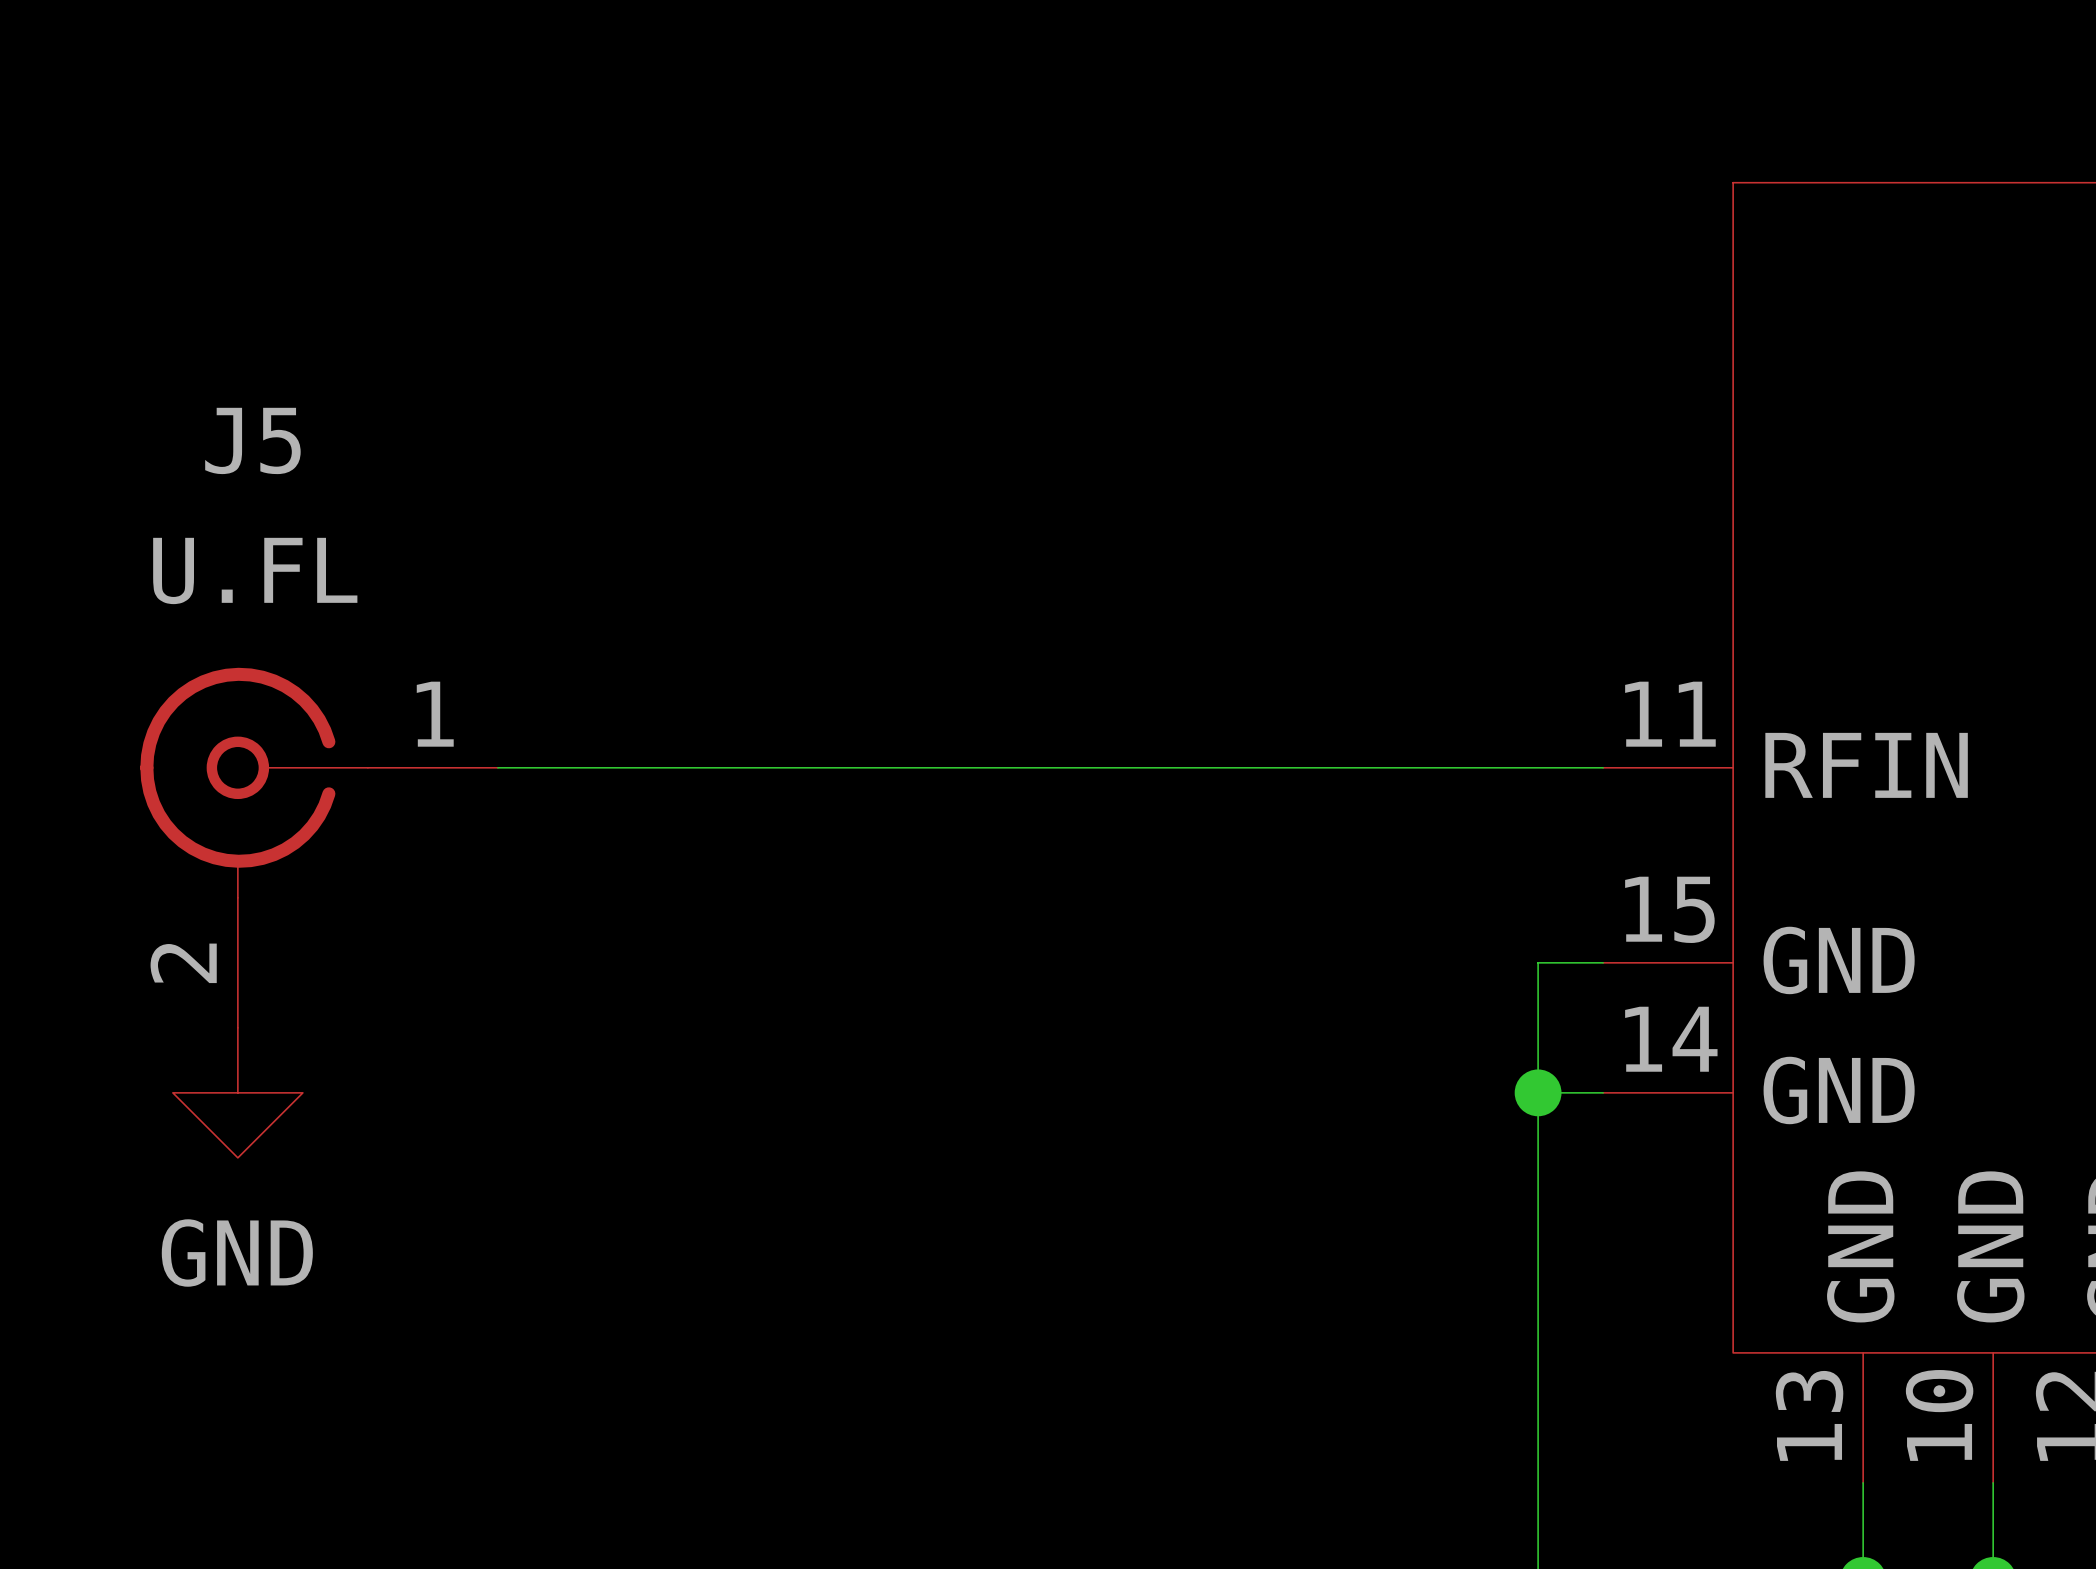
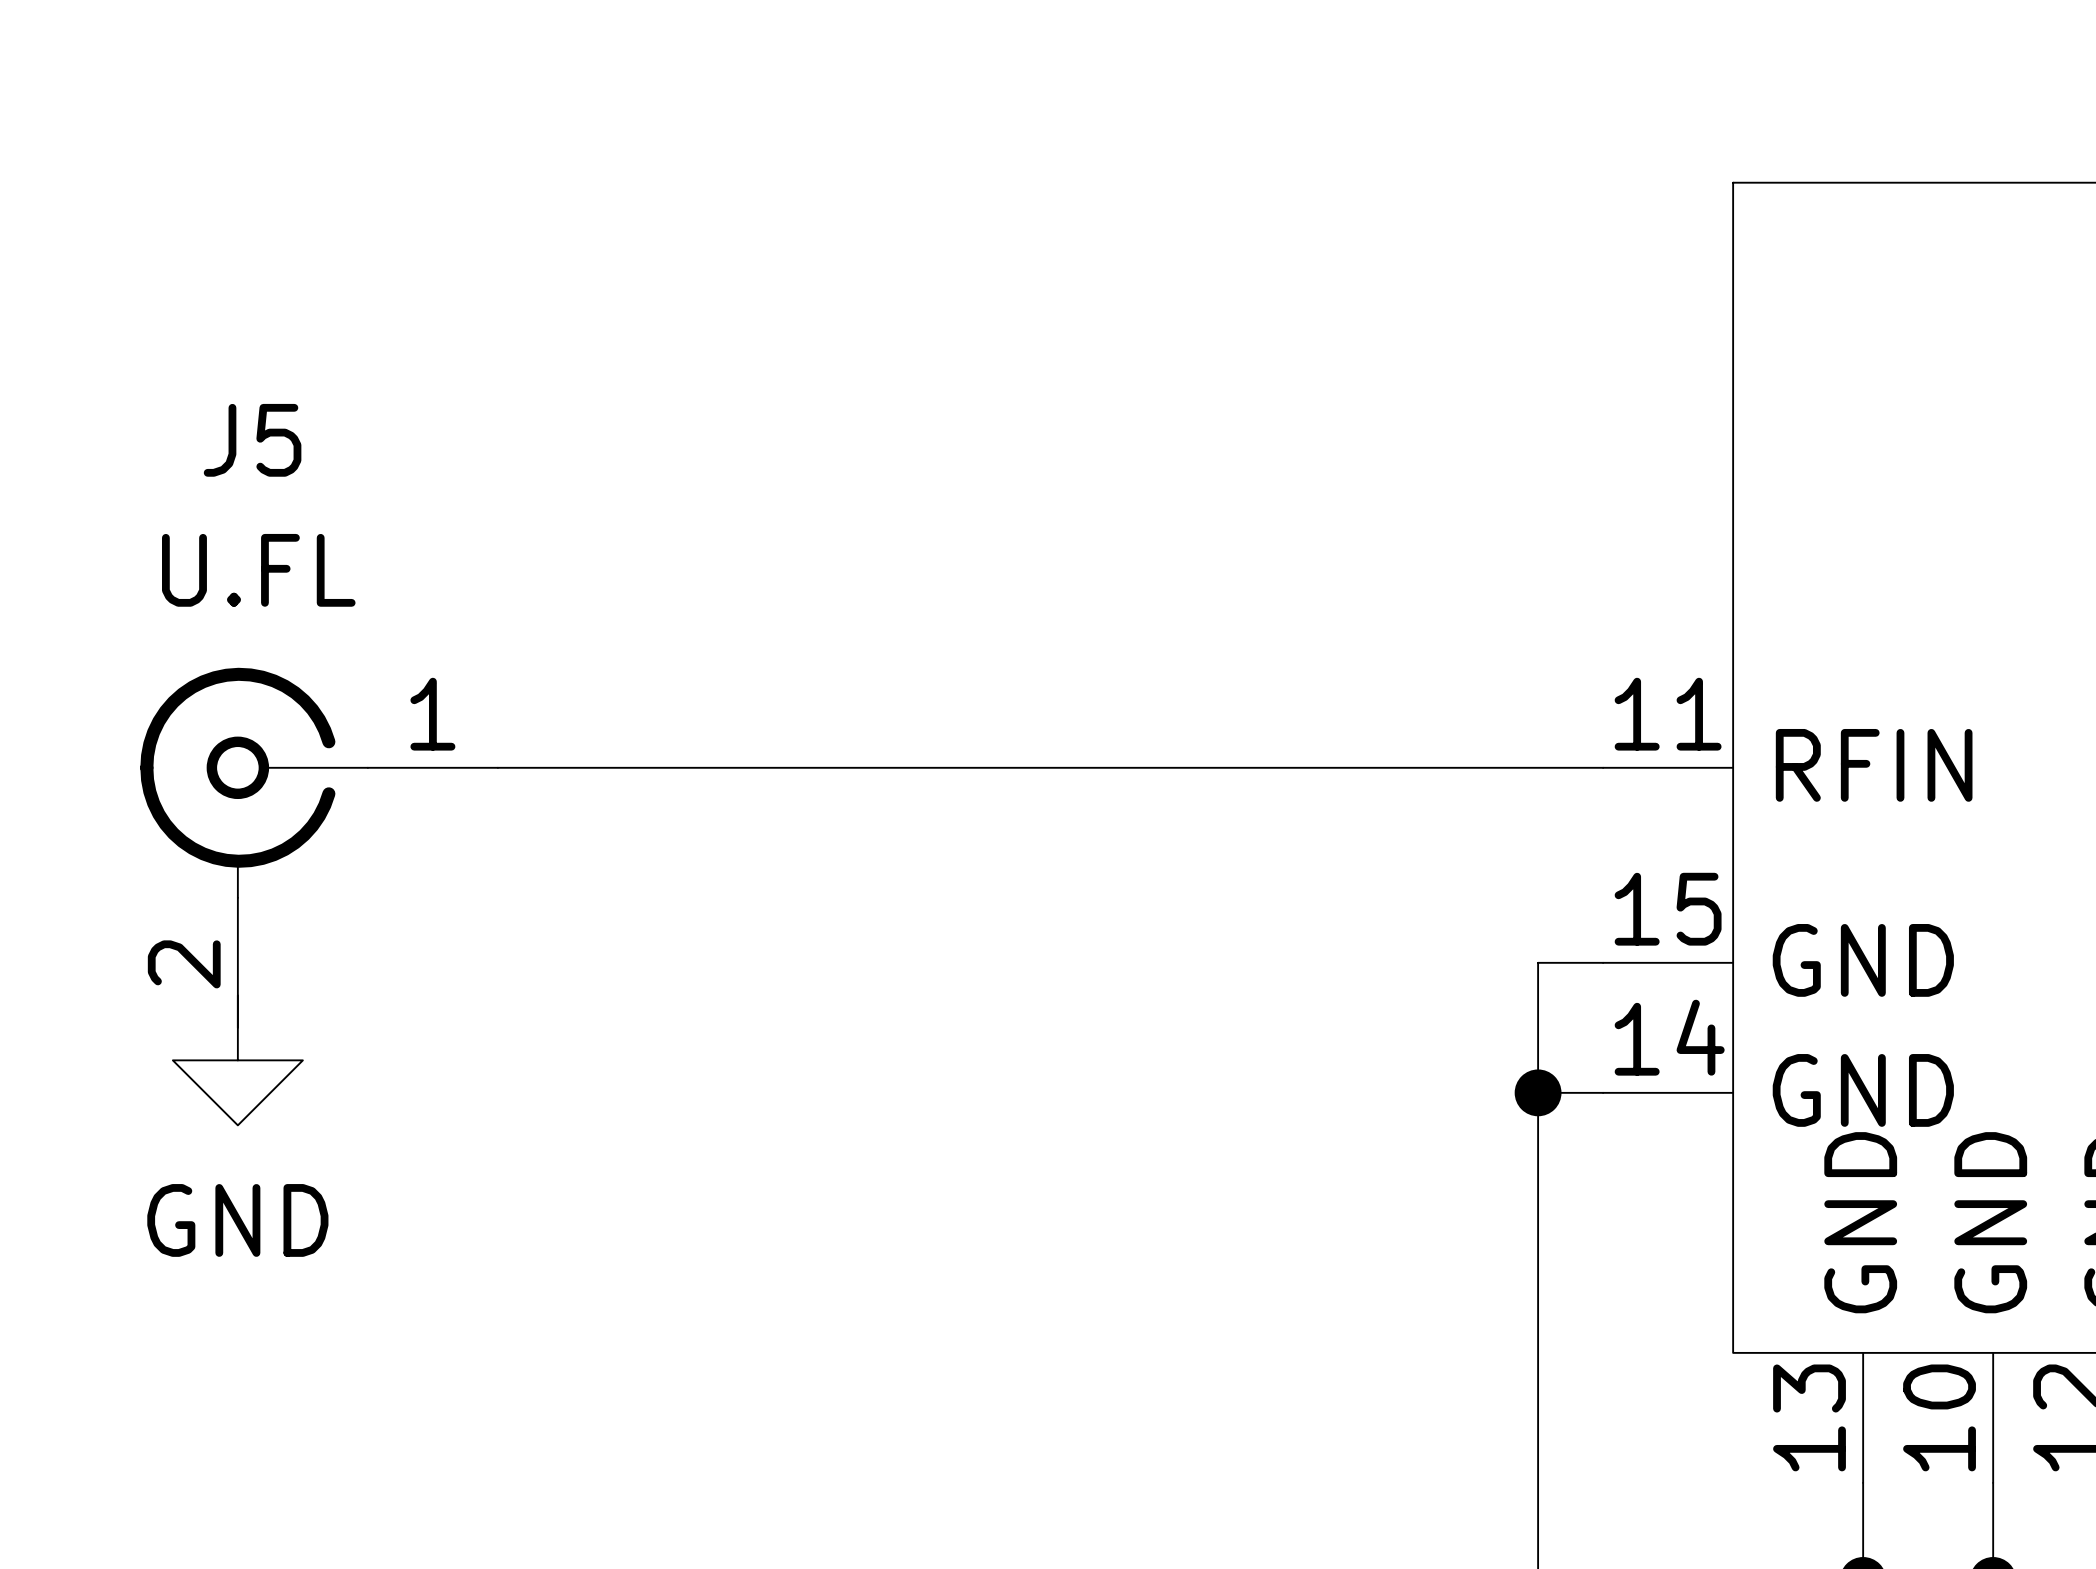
power symbol position: GND (237, 1092) -> GND (237, 1060)

